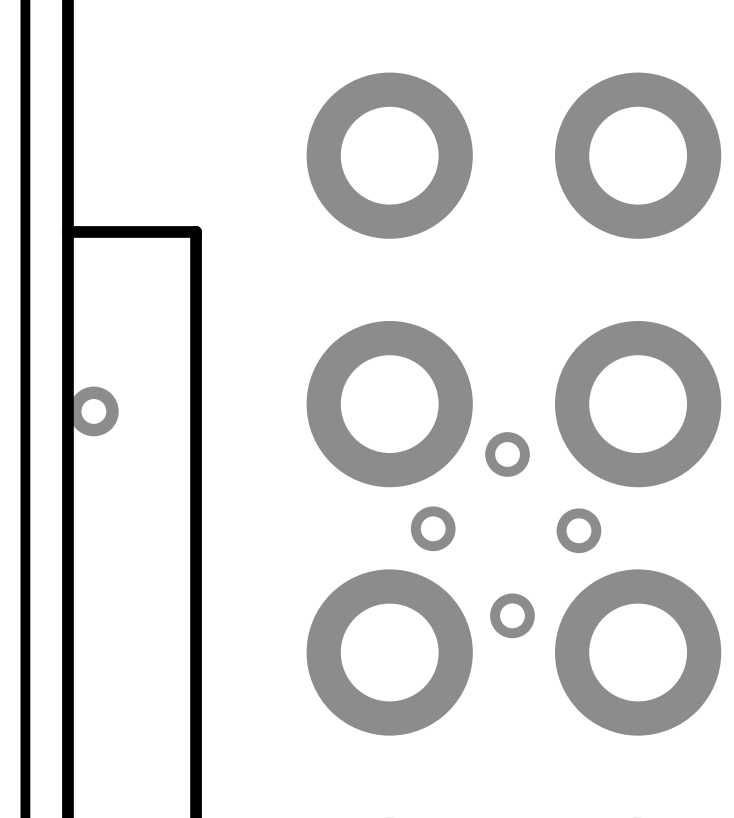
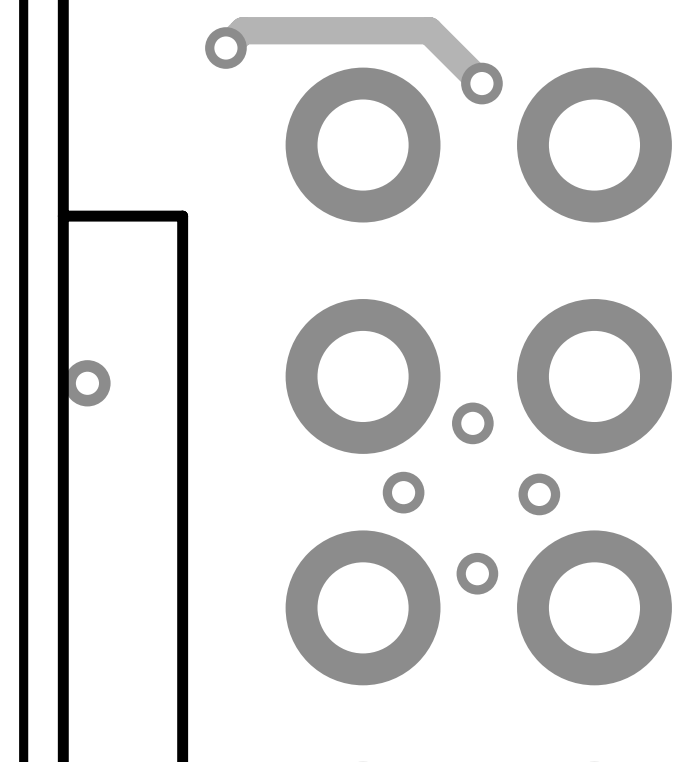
track: none -> (225, 48) (243, 30) (429, 30) (481, 83)
via: none -> (225, 48)
via: none -> (481, 83)

